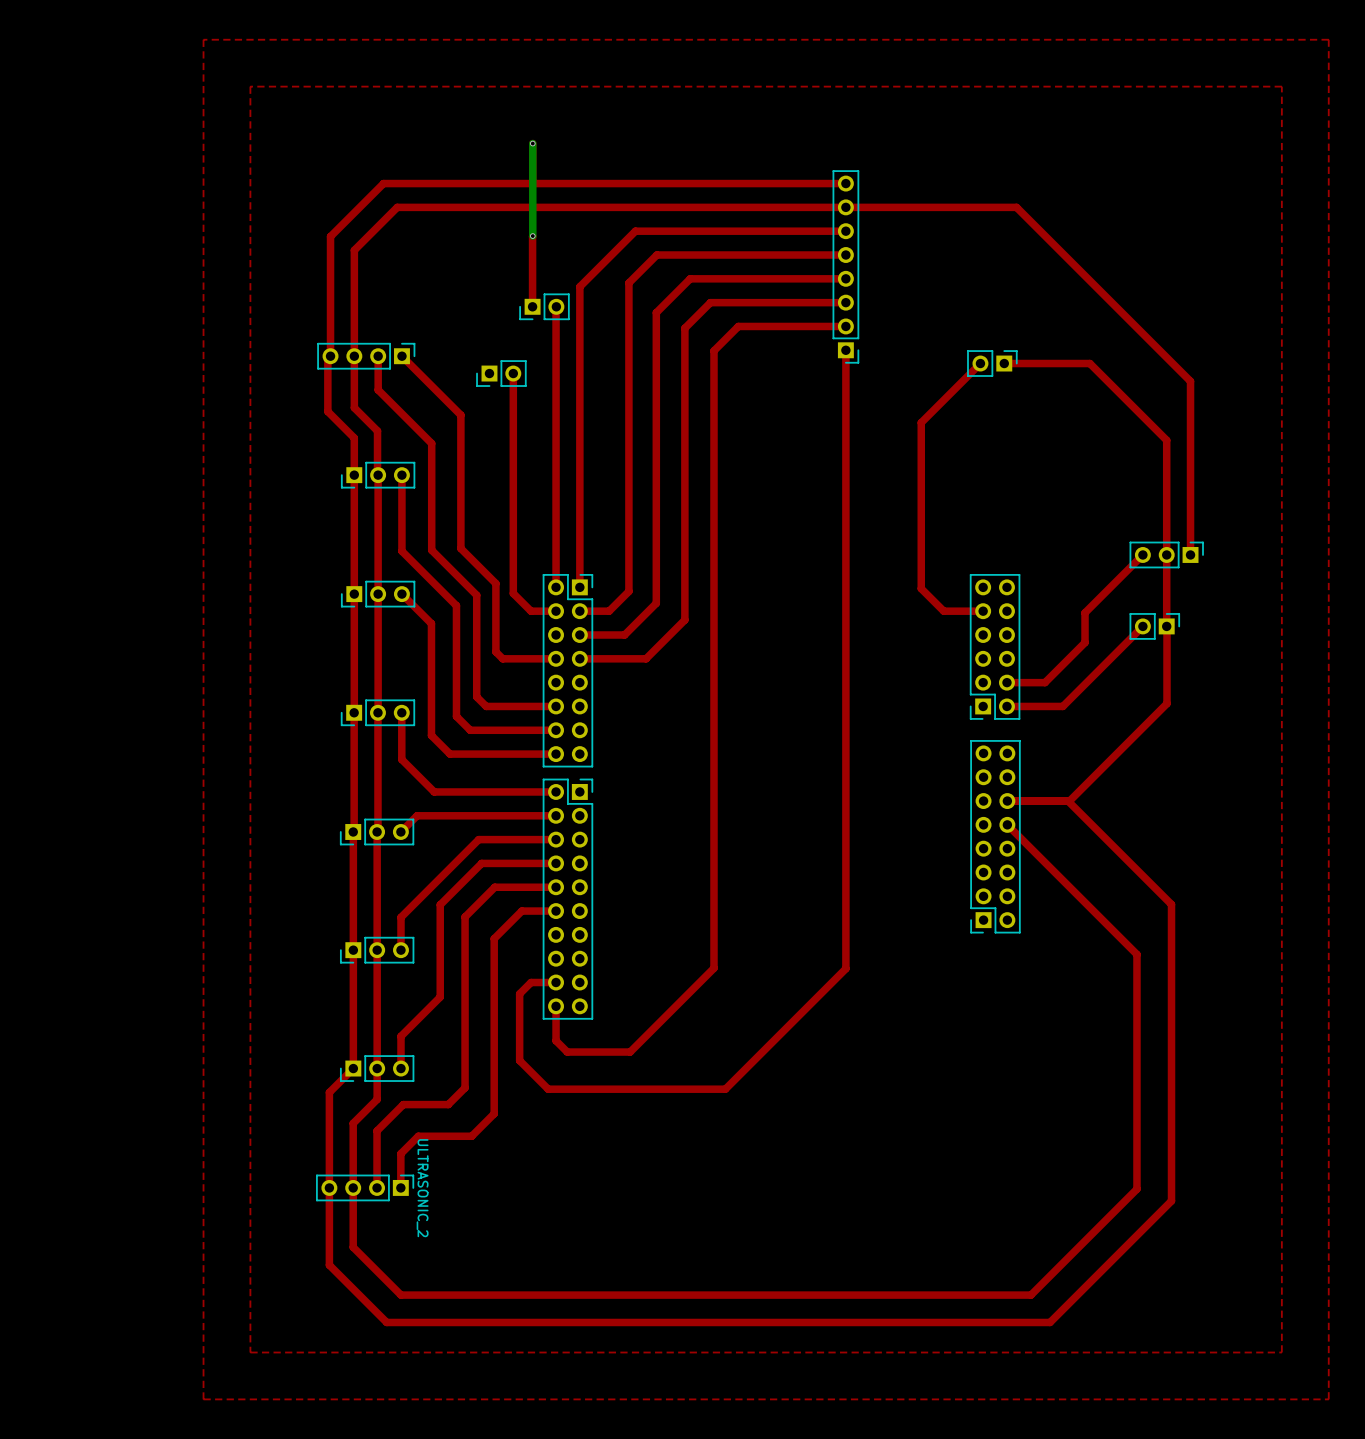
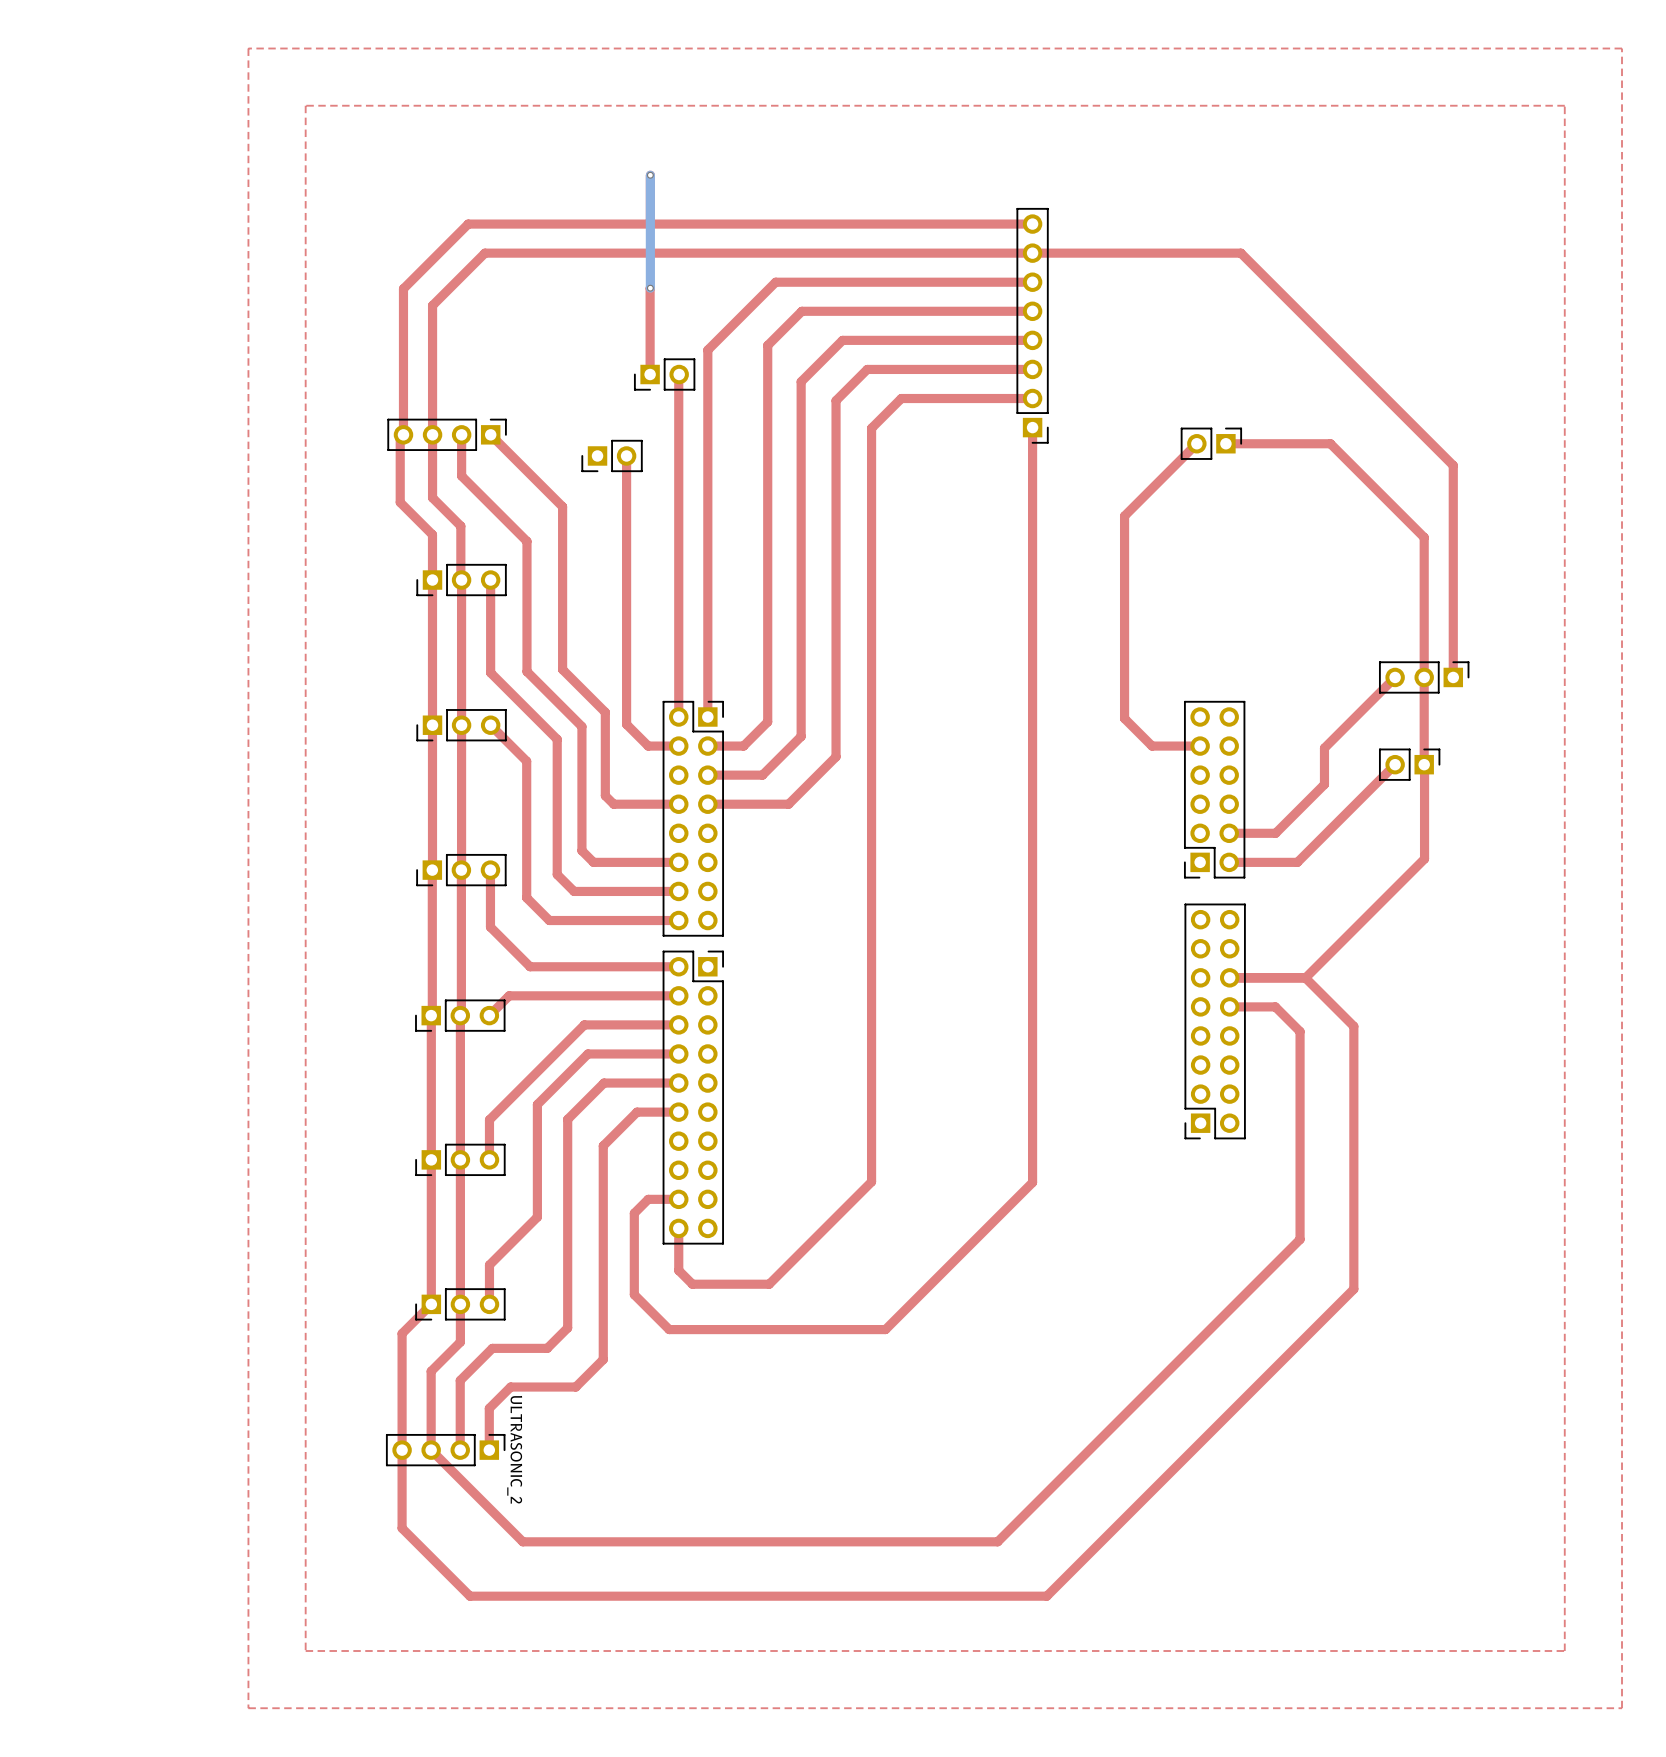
top track: (1068, 801) (1171, 904) (1171, 1201) (1050, 1322) (386, 1322) (329, 1265) (329, 1251) -> (1305, 977) (1353, 1026) (1353, 1289) (1046, 1596) (470, 1596) (402, 1528)
top track: (1007, 824) (1136, 954) (1136, 1189) (1030, 1295) (401, 1295) (353, 1247) (353, 1187) -> (1229, 1006) (1275, 1006) (1300, 1031) (1300, 1239) (997, 1541) (522, 1541) (431, 1450)

